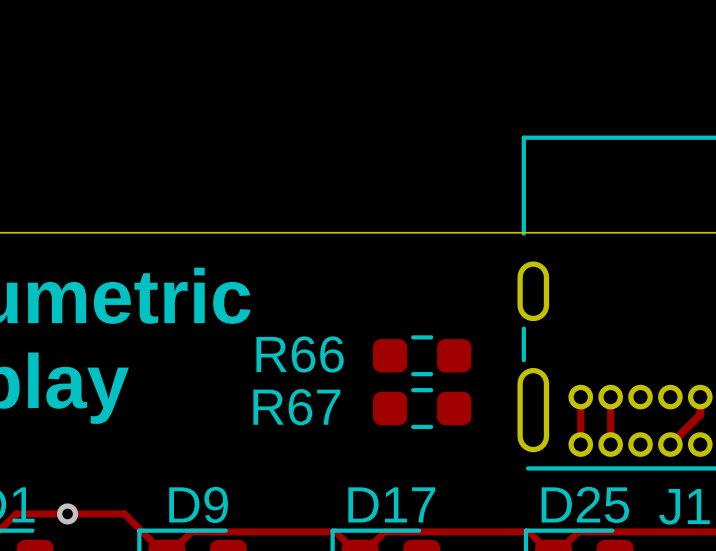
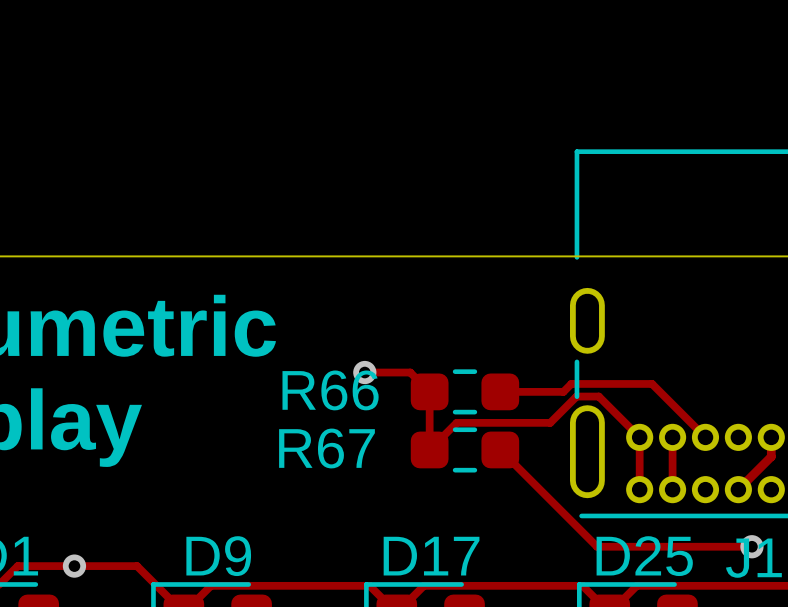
track: none -> (364, 372) (410, 372) (429, 391) (429, 449) (456, 422) (550, 422) (576, 396) (598, 396) (639, 437)
via: none -> (364, 372)
track: none -> (500, 391) (563, 391) (571, 383) (652, 383) (705, 437)
track: none -> (500, 449) (597, 546) (751, 546)
via: none -> (751, 546)

